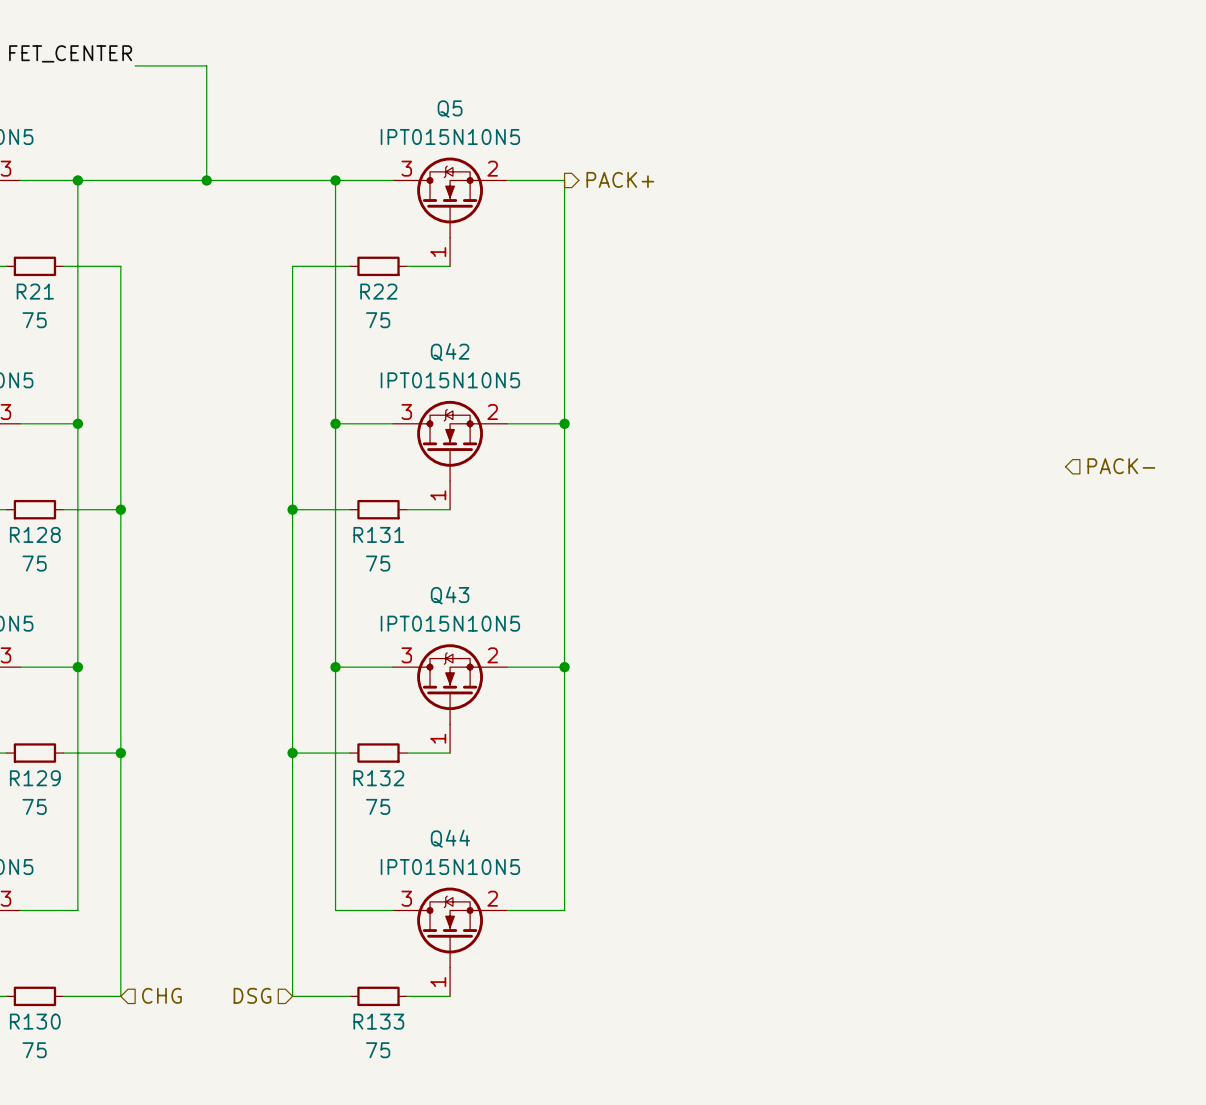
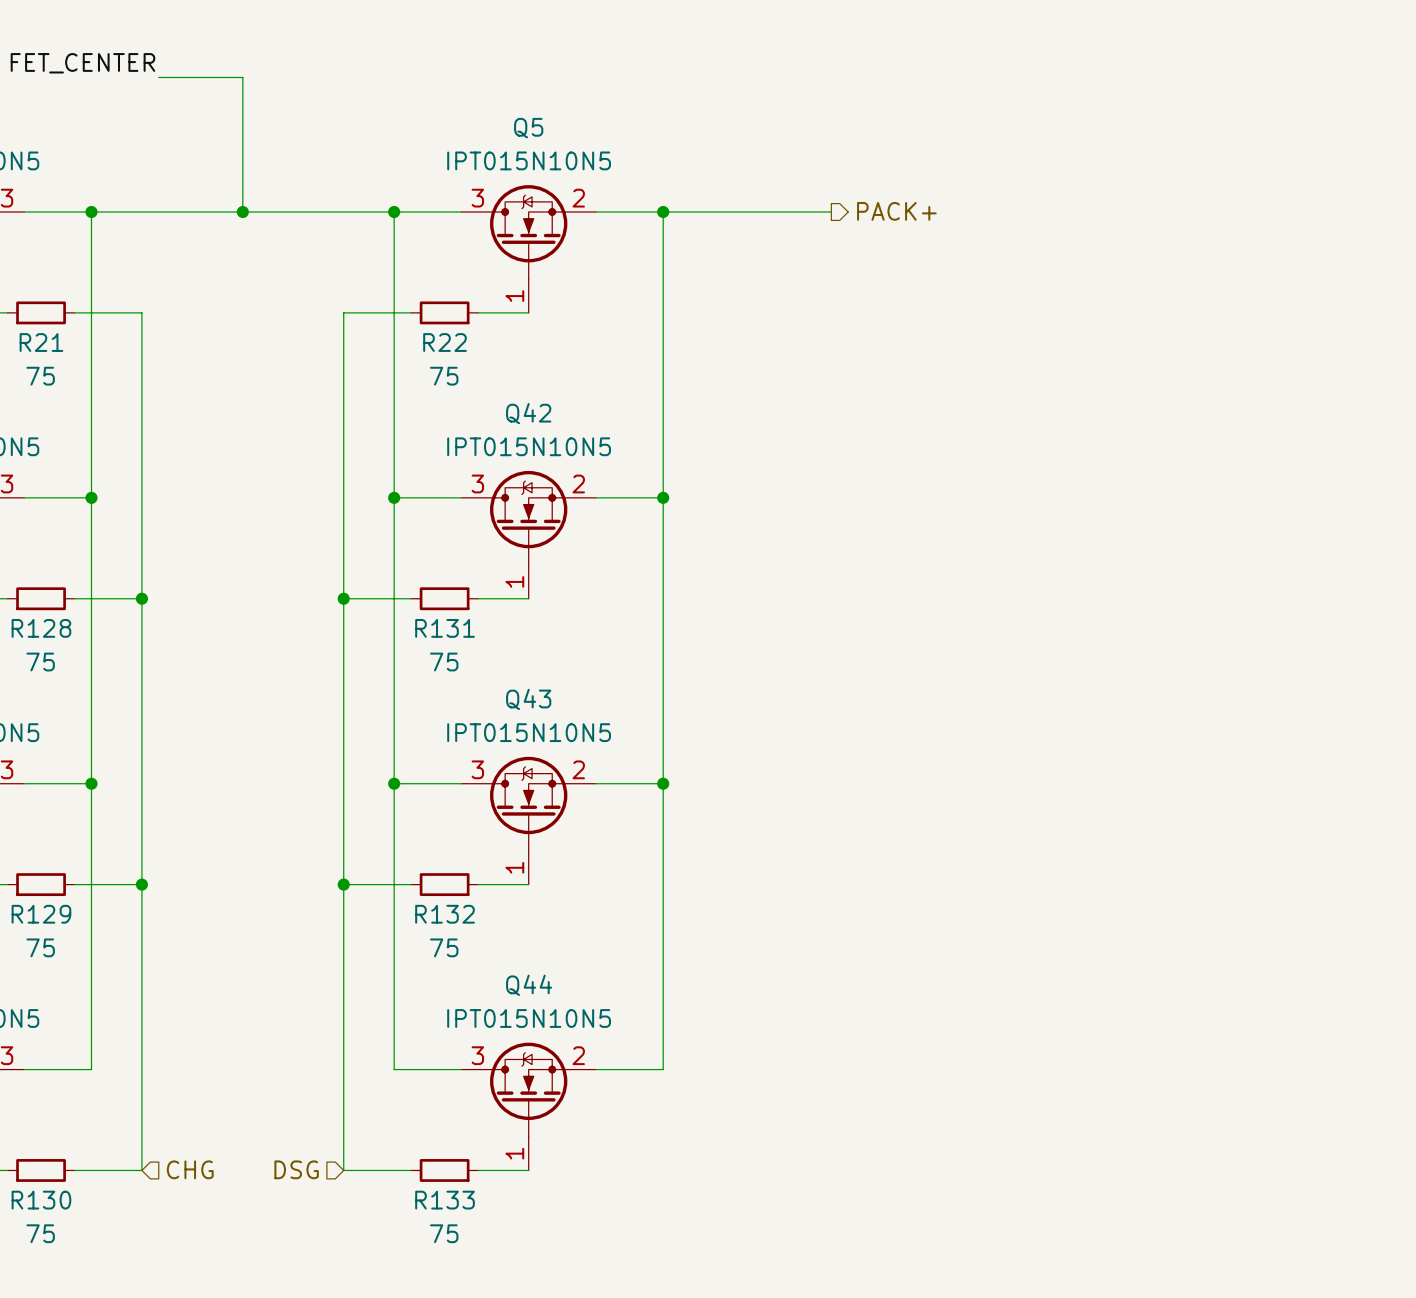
hierarchical label position: PACK+ (620, 179) -> PACK+ (896, 211)
wire: none -> (663, 212) (831, 212)
junction: none -> (663, 212)
hierarchical label: PACK- (1121, 466) -> none

